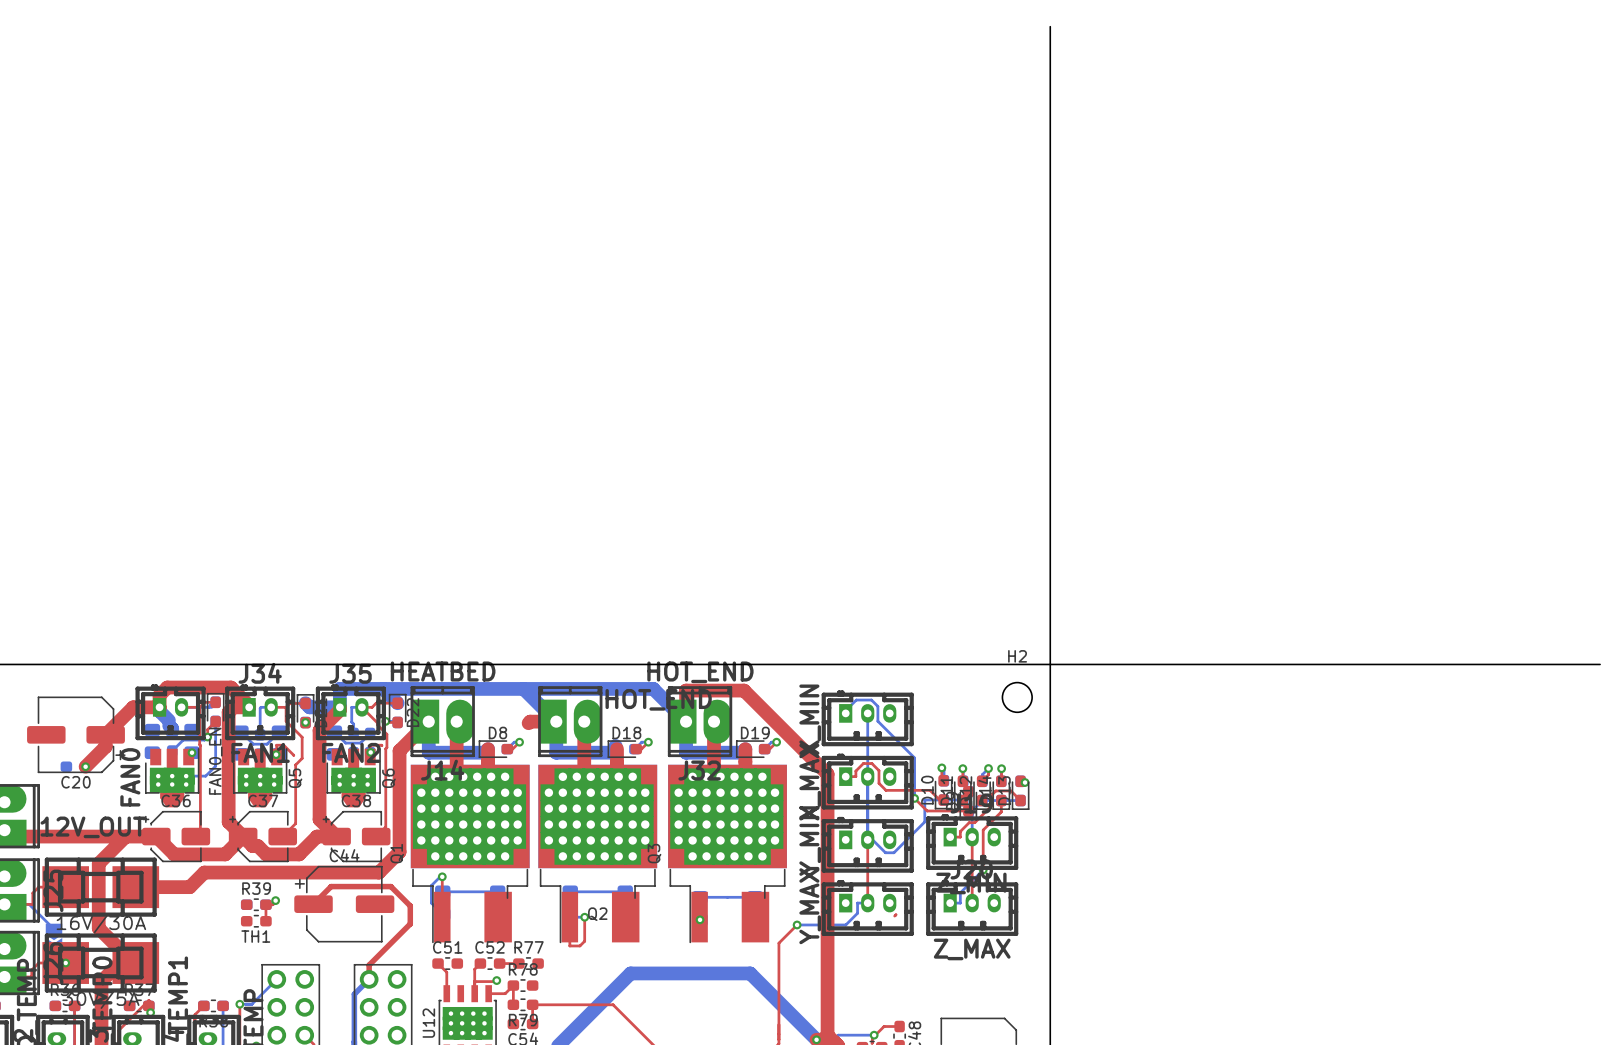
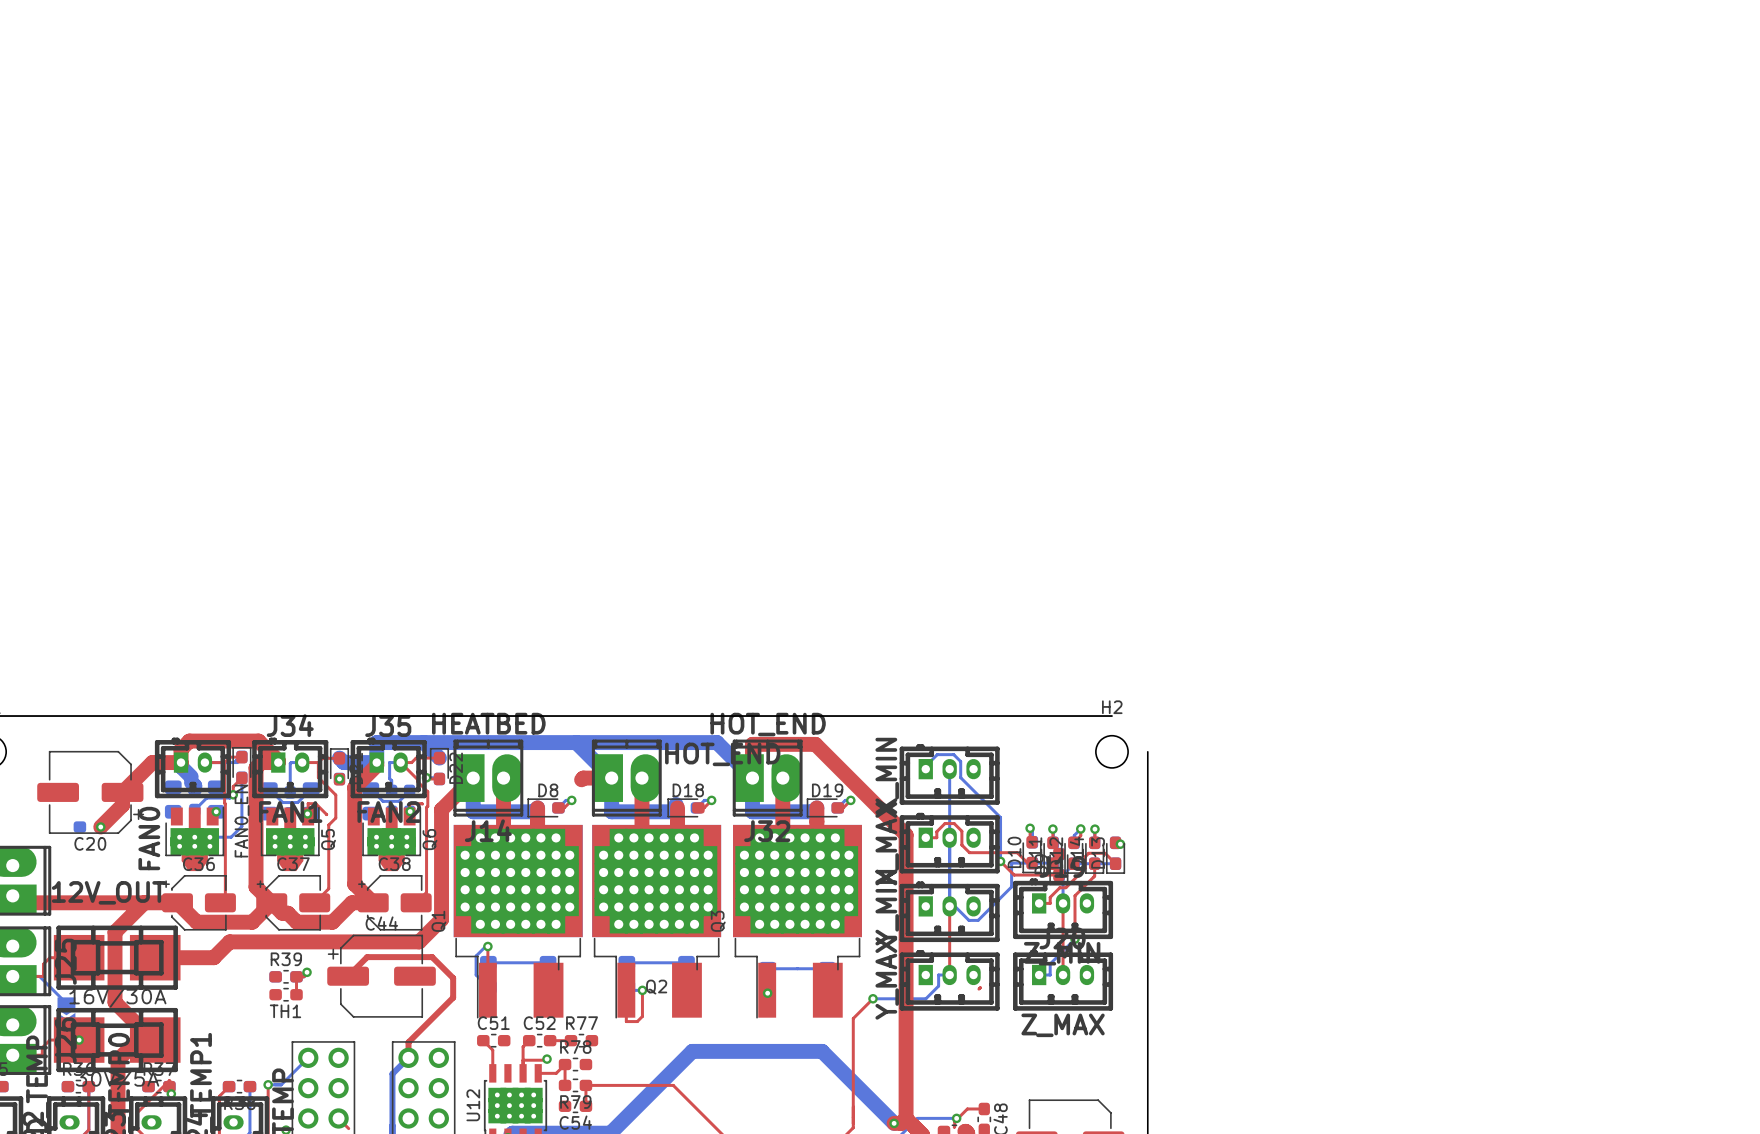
board edge: (1050, 26) (1050, 697) -> none
board edge: (1017, 664) (1600, 664) -> none

